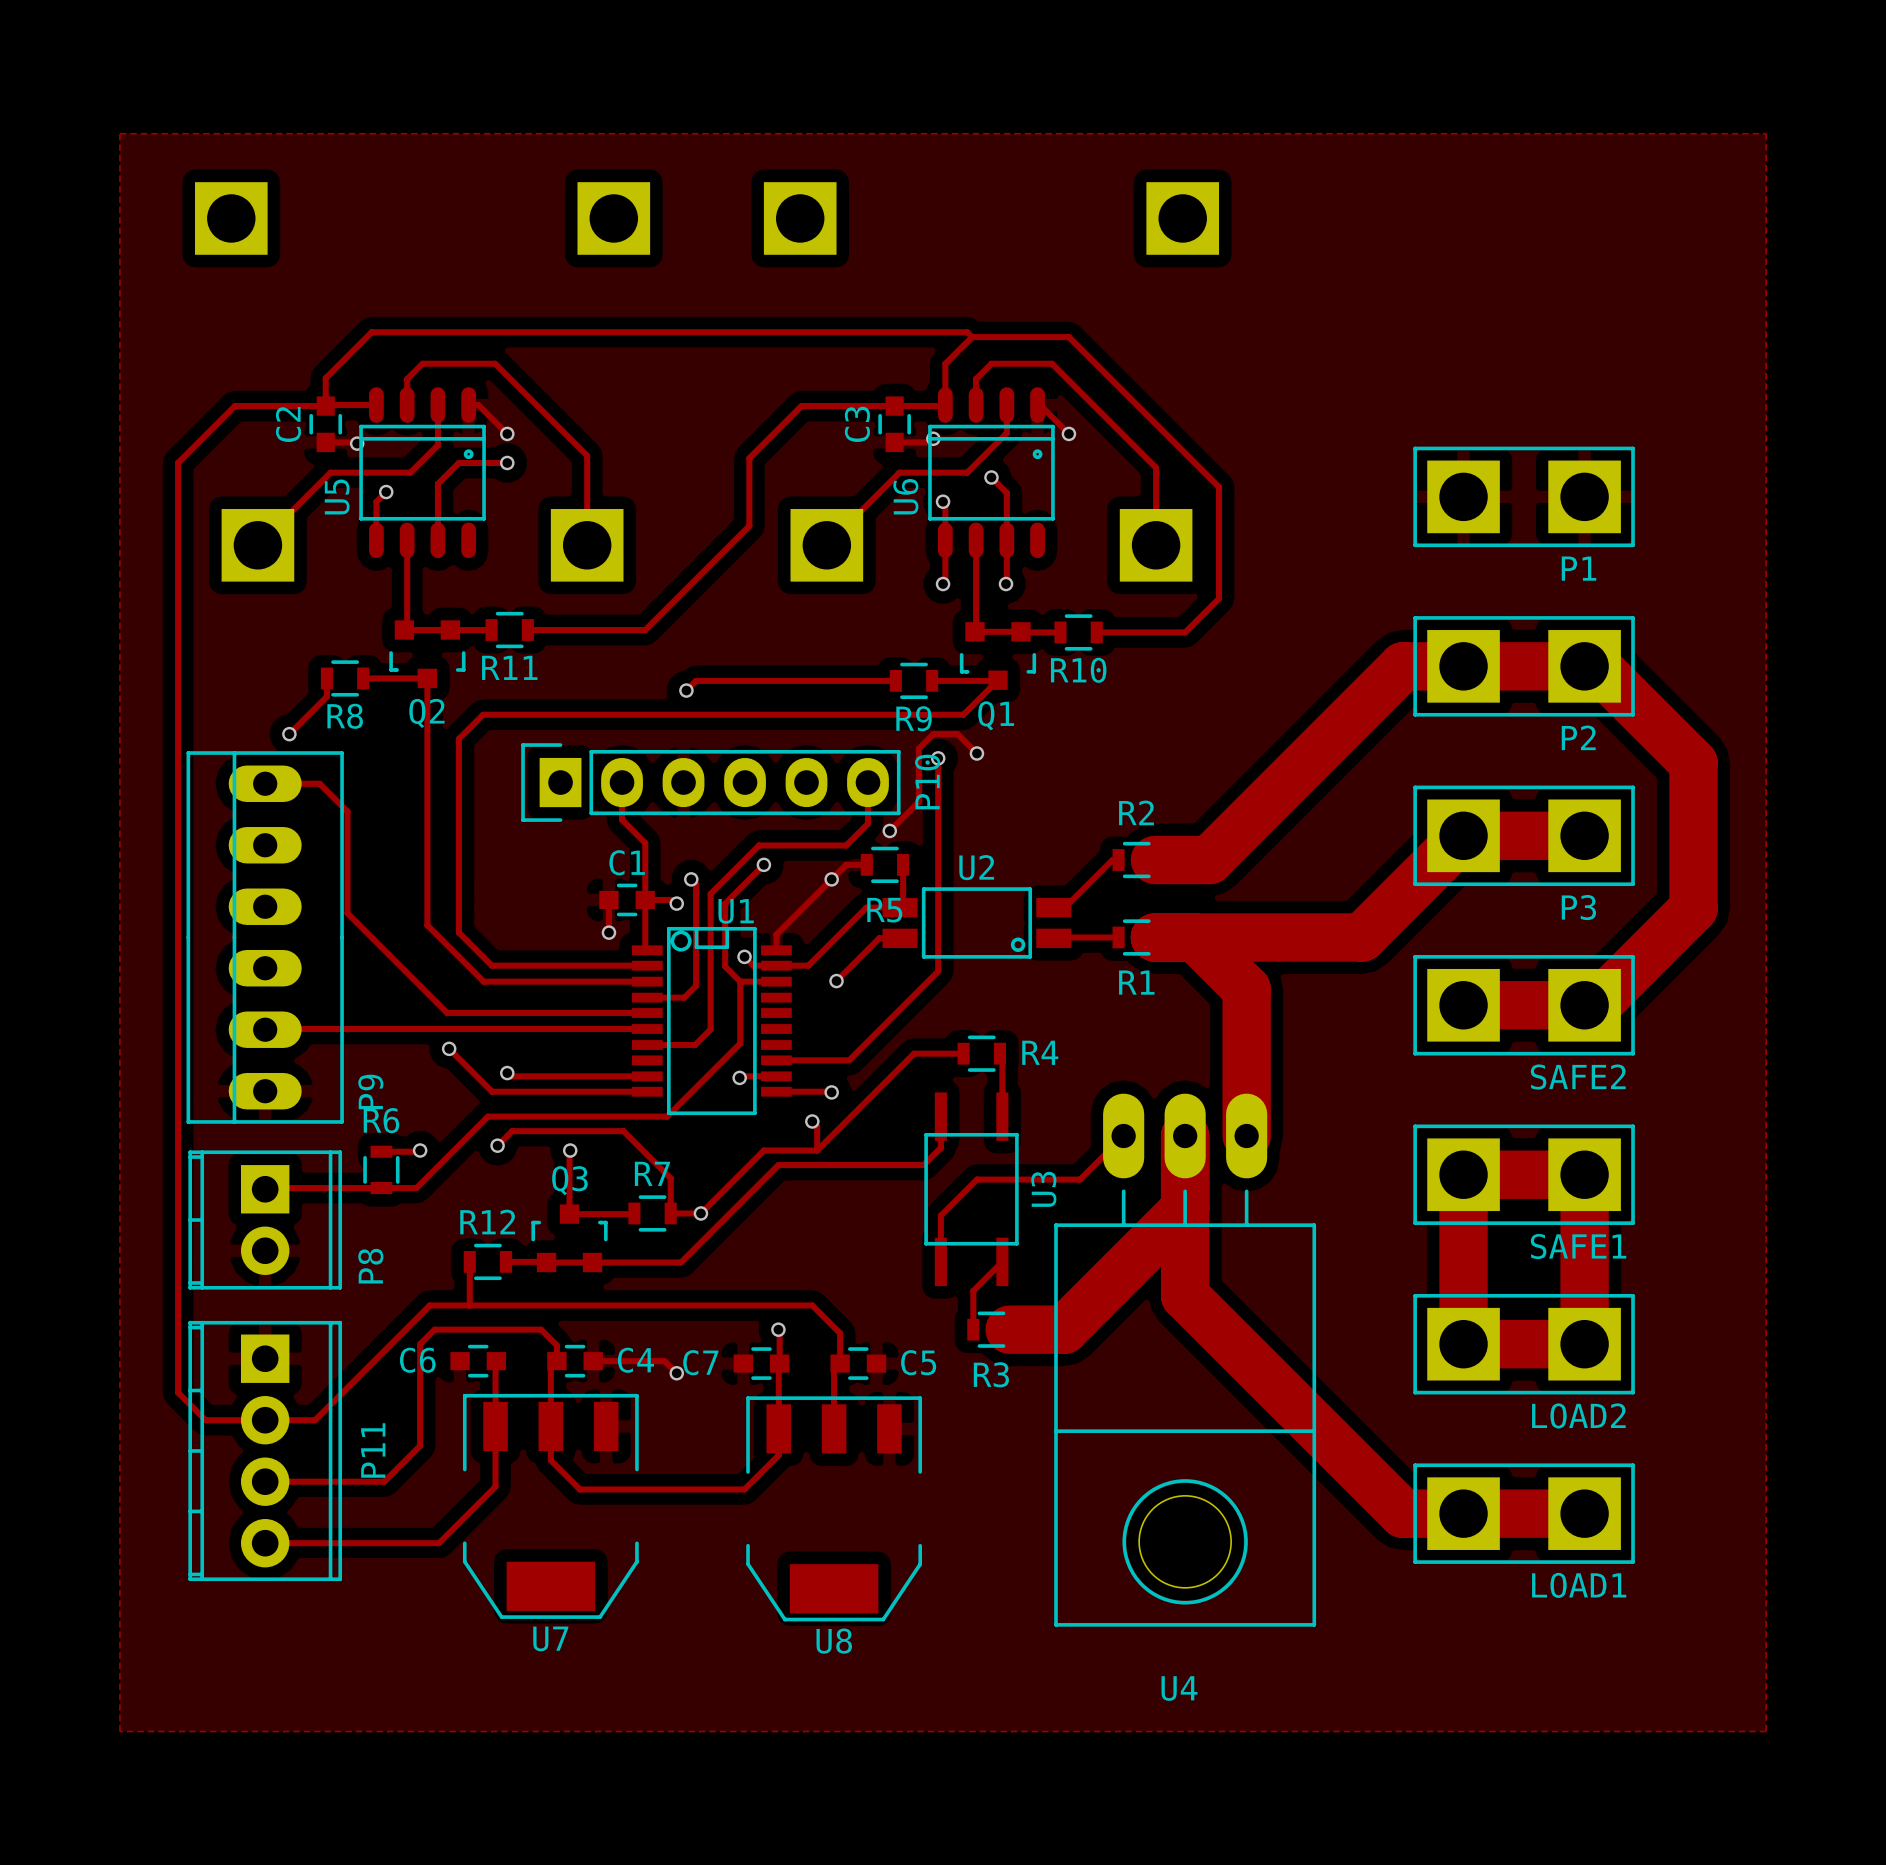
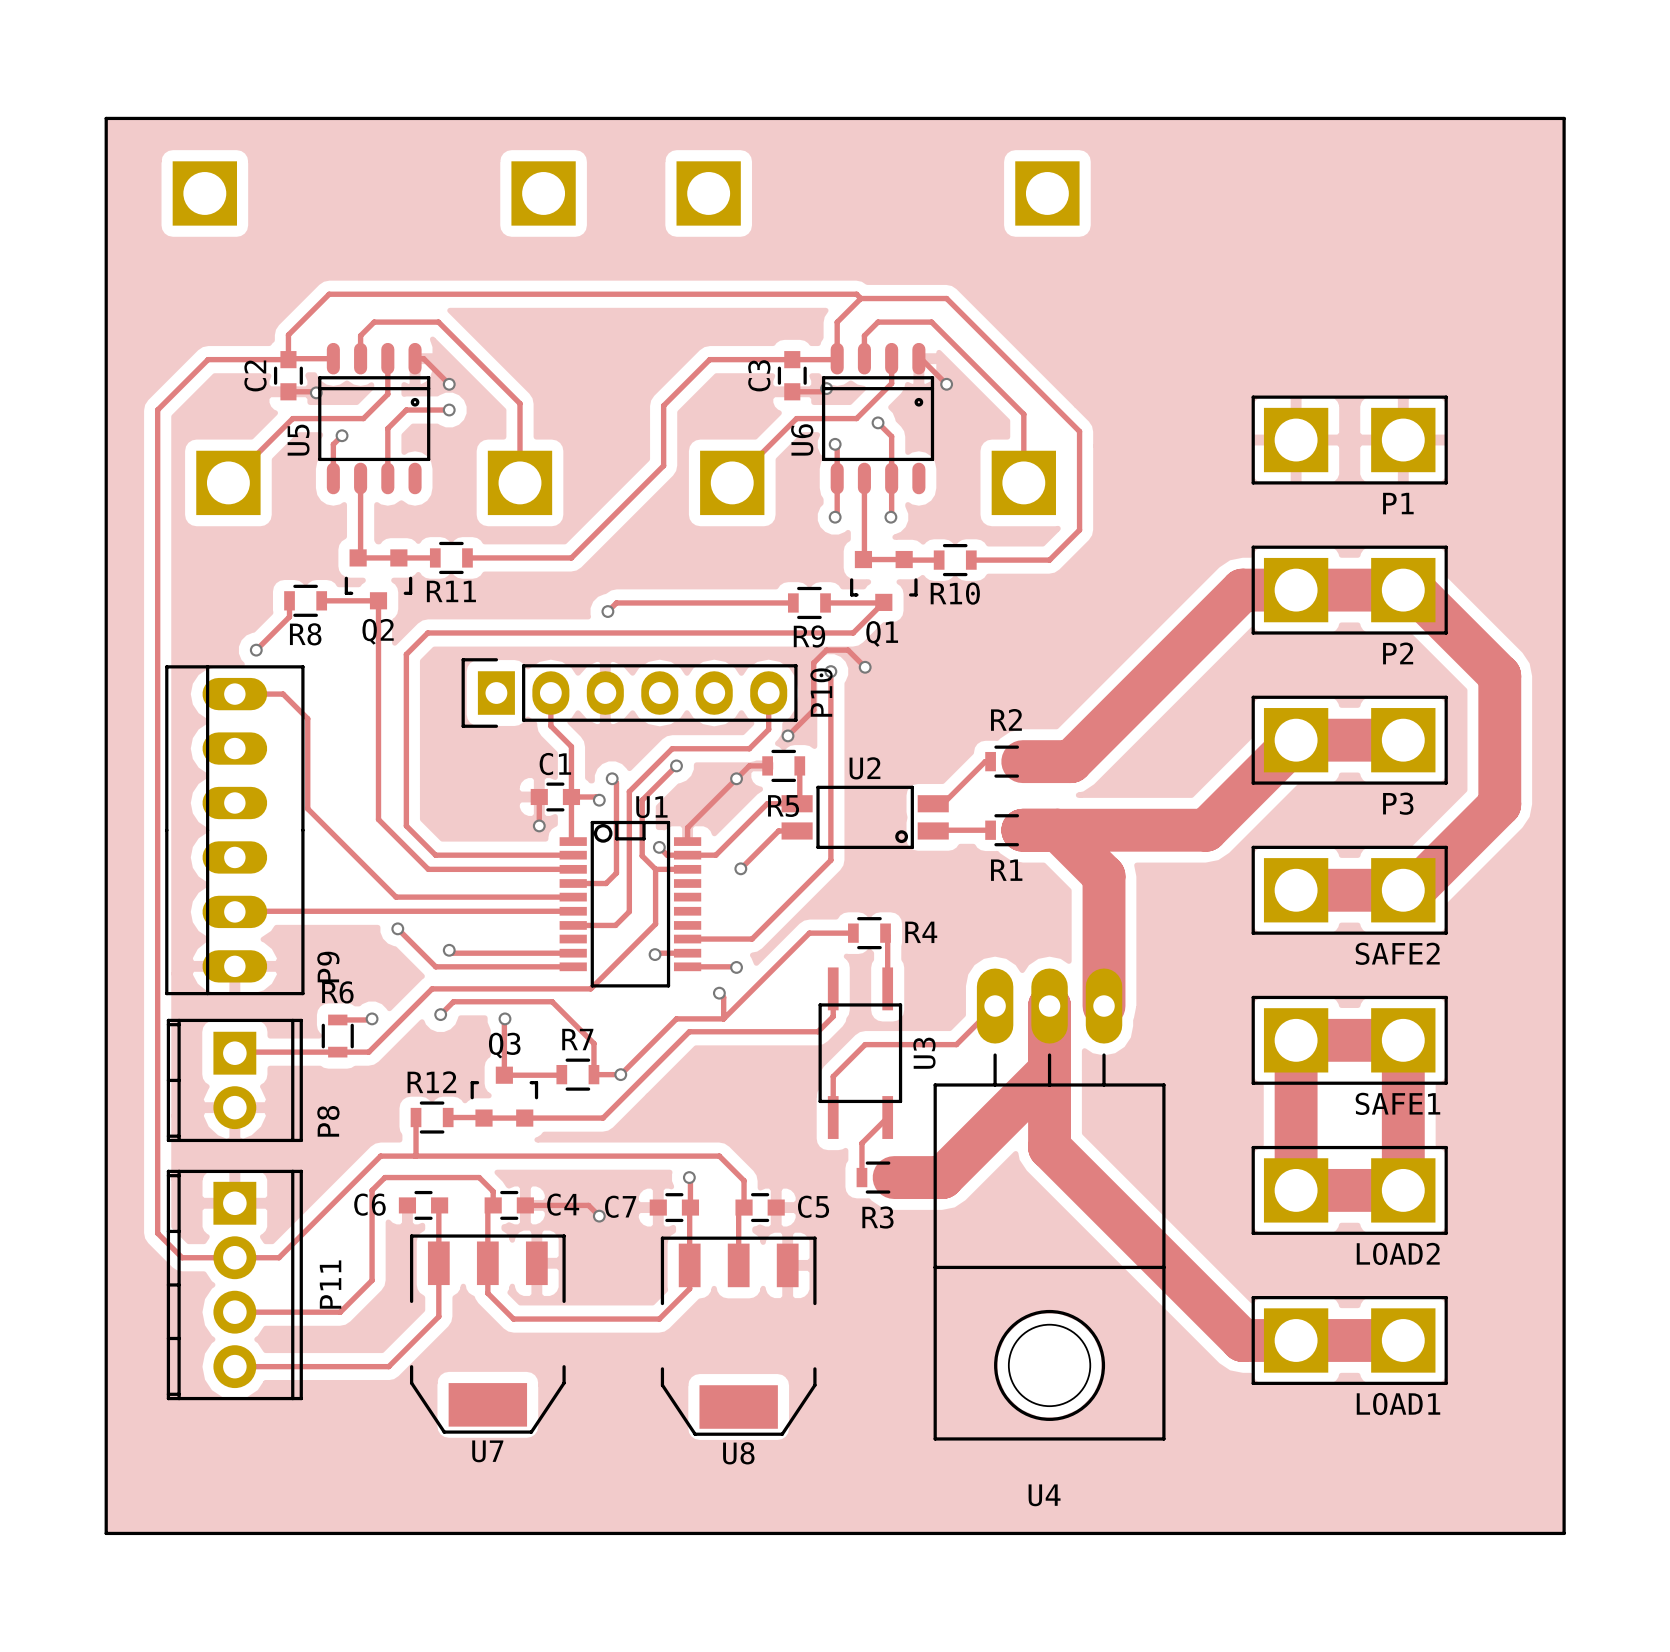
board edge: none -> (106, 118) (106, 1533) (1564, 1533) (1564, 118) (106, 118)

